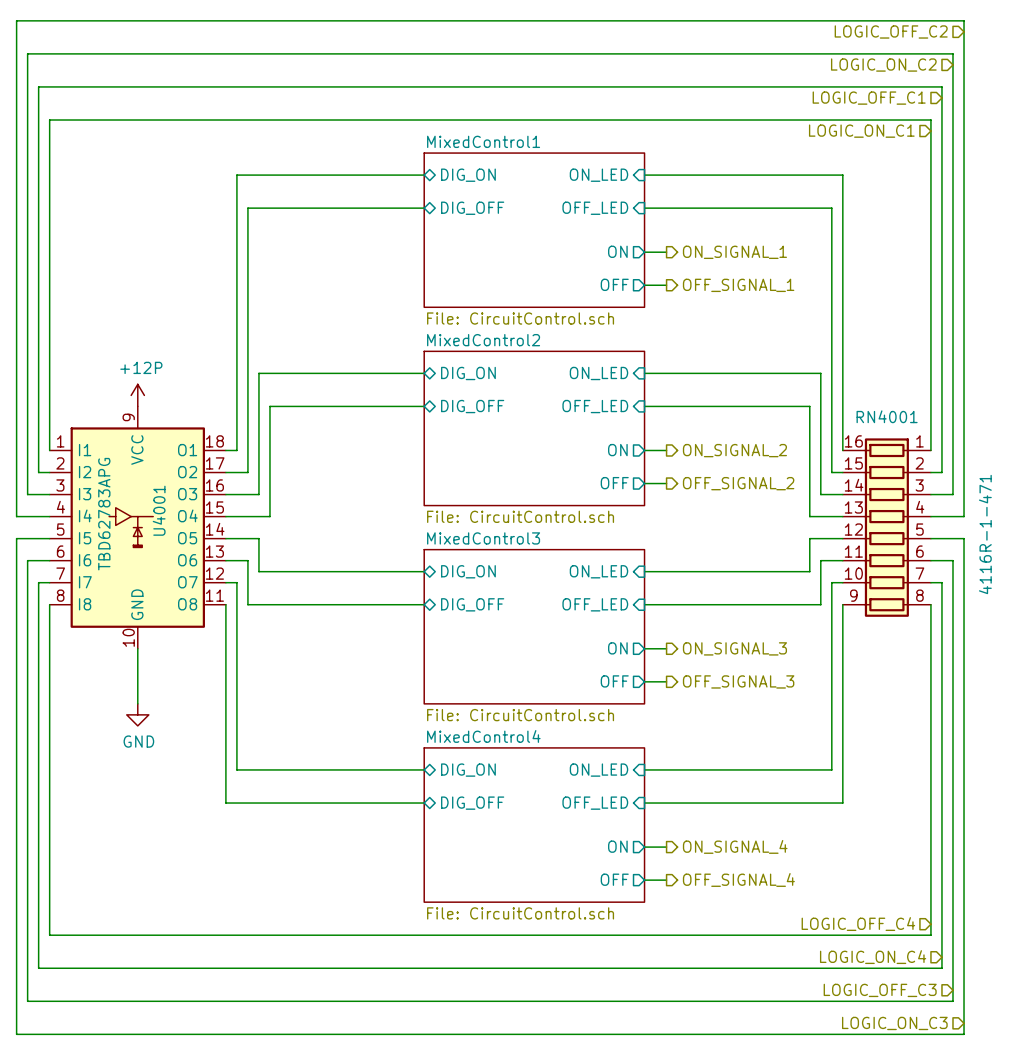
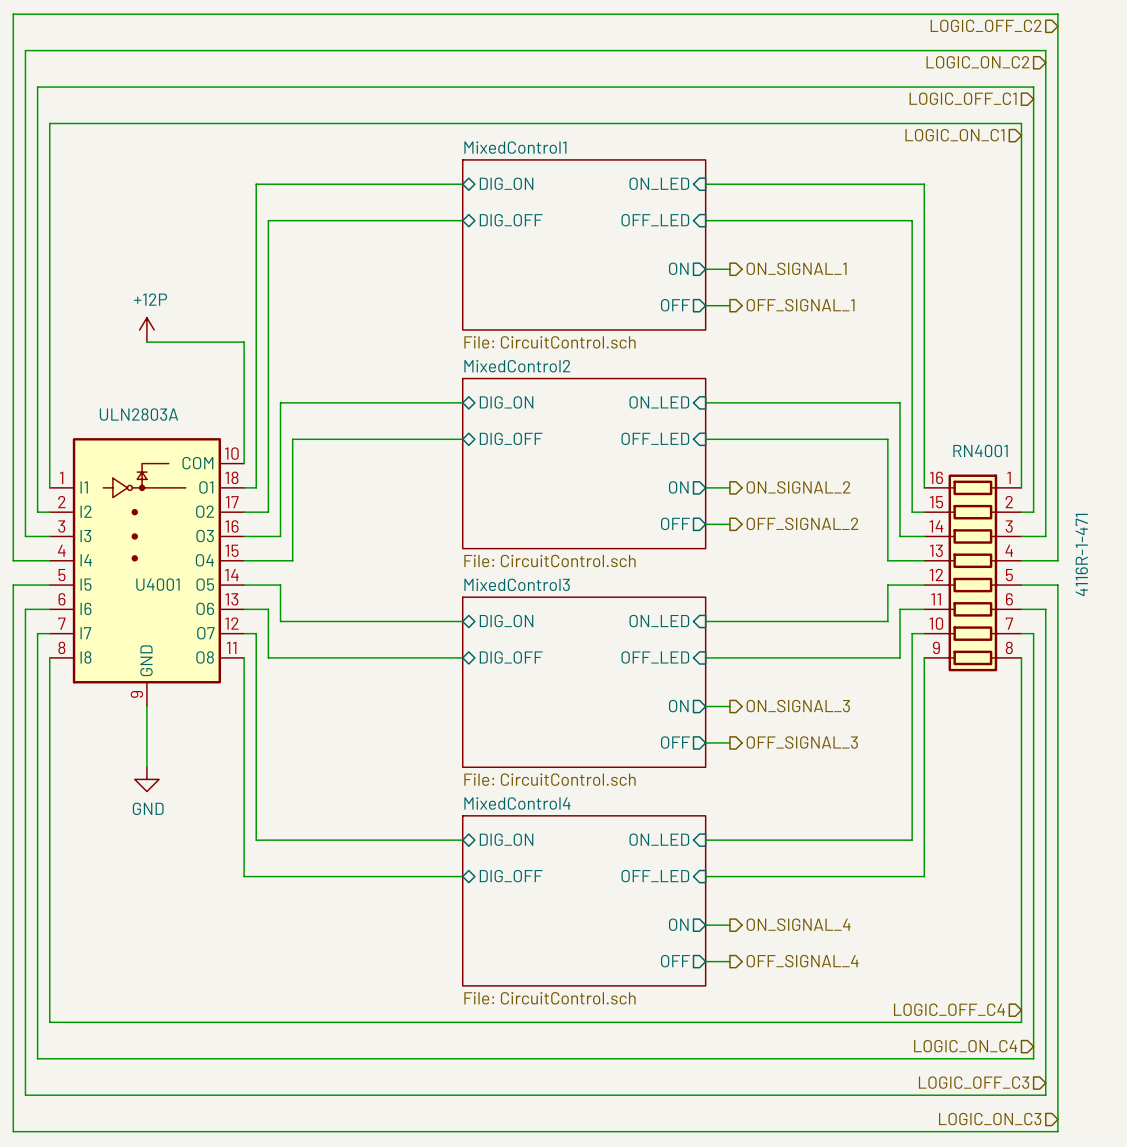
wire: none -> (146, 342) (244, 342) (244, 463)
power symbol position: +12P (137, 395) -> +12P (146, 329)
U4001 symbol: [49, 406, 226, 649] -> [49, 438, 245, 707]
U4001 name position: U4001 (159, 510) -> U4001 (157, 584)
U4001 value: TBD62783APG (104, 514) -> ULN2803A (138, 414)

